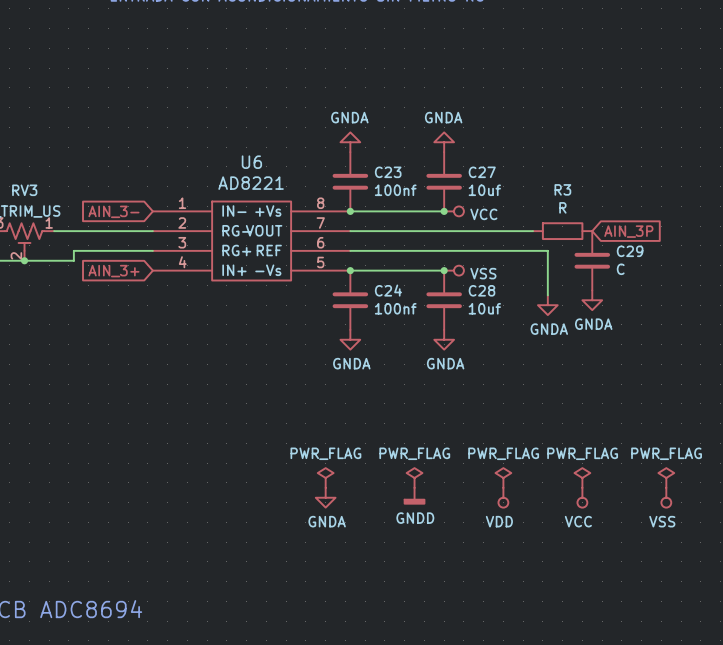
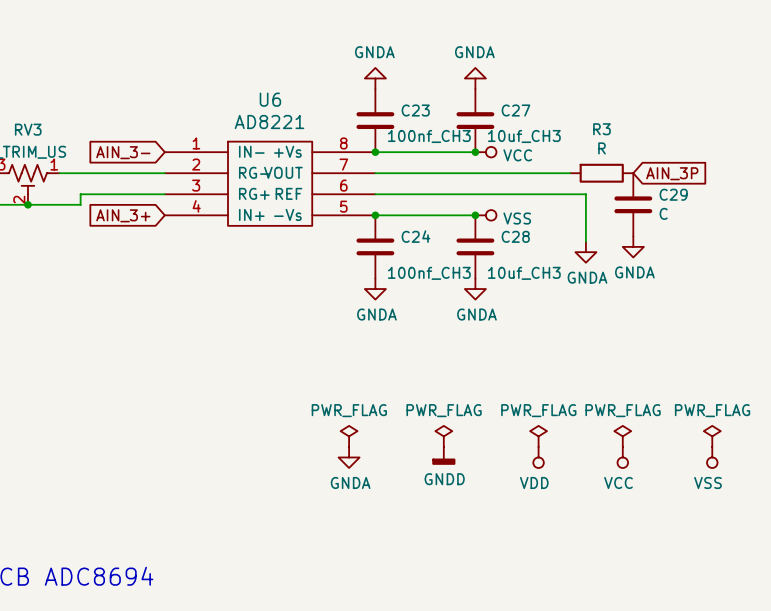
C23 value: 100nf (395, 190) -> 100nf_CH3 (429, 136)
C27 value: 10uf (484, 190) -> 10uf_CH3 (524, 136)
C24 value: 100nf (395, 308) -> 100nf_CH3 (429, 273)
C28 value: 10uf (484, 308) -> 10uf_CH3 (524, 273)

